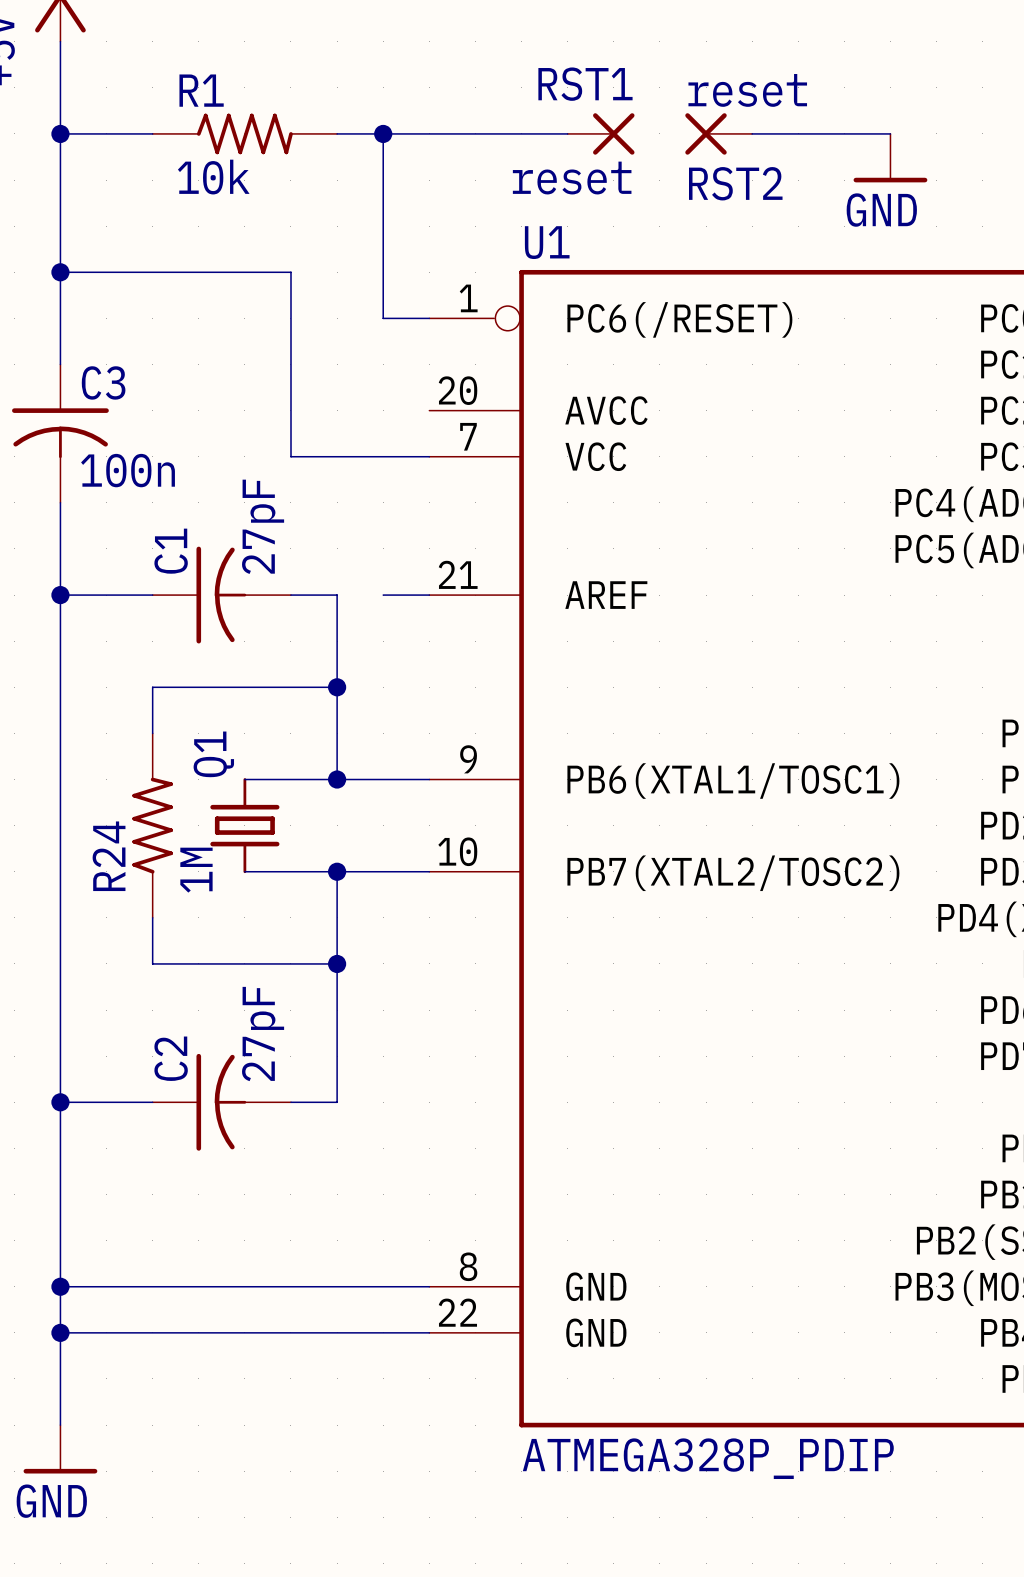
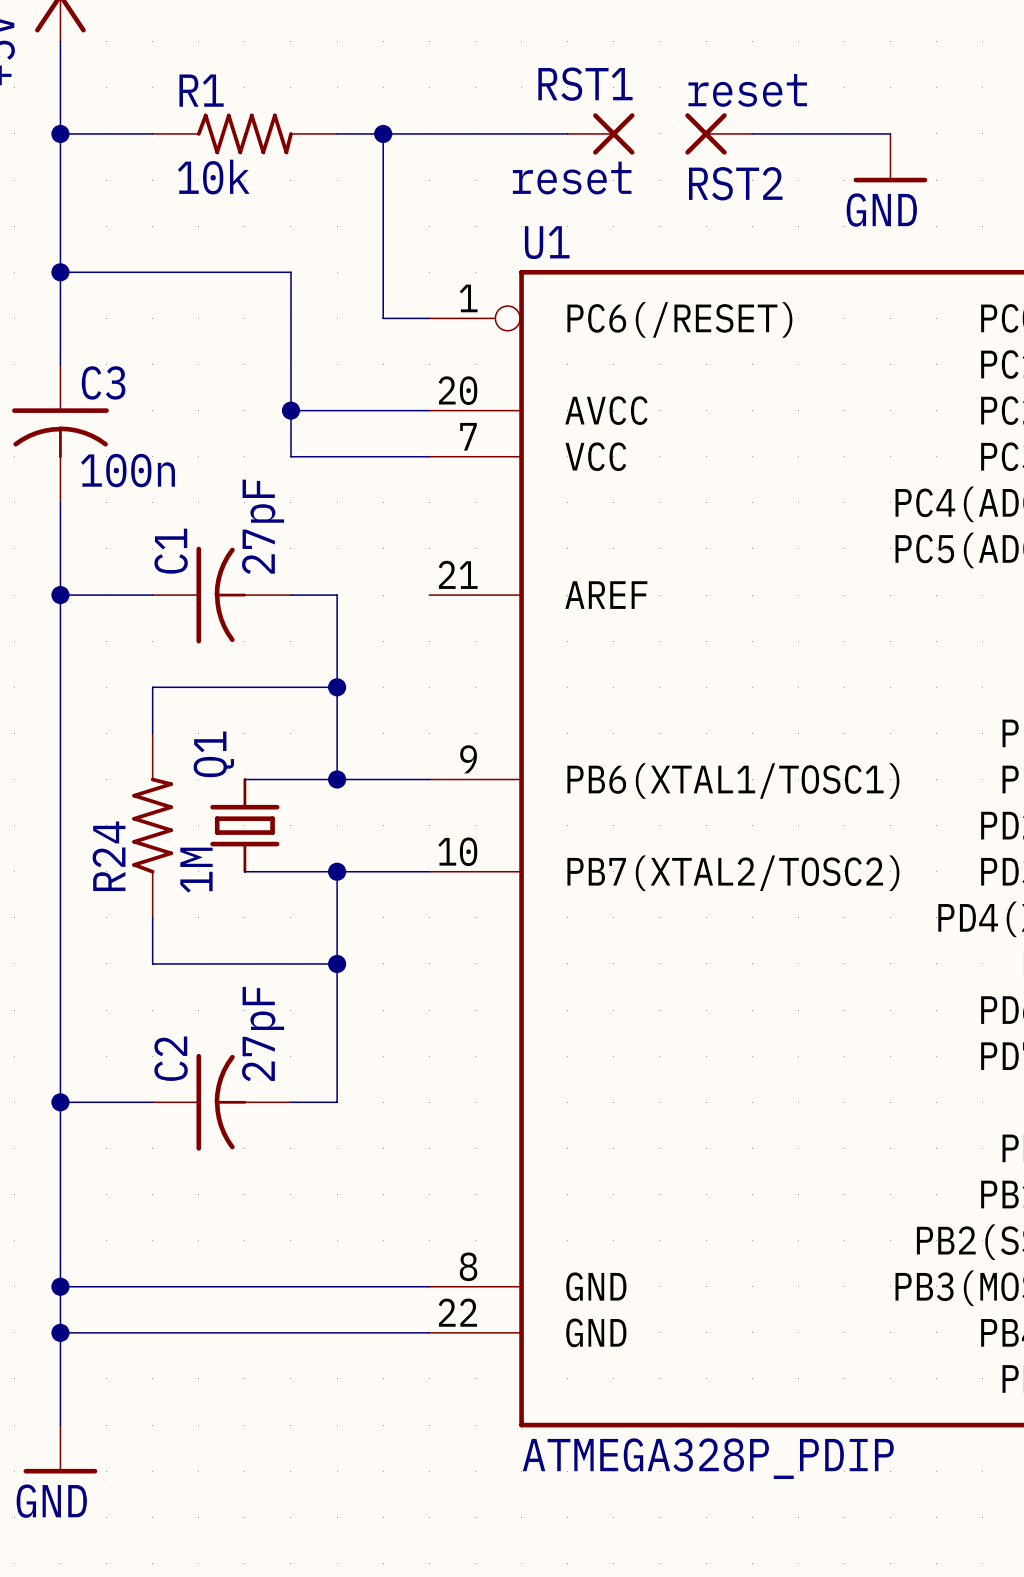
wire: none -> (290, 410) (429, 410)
junction: none -> (290, 410)
wire: (383, 595) (429, 595) -> none

